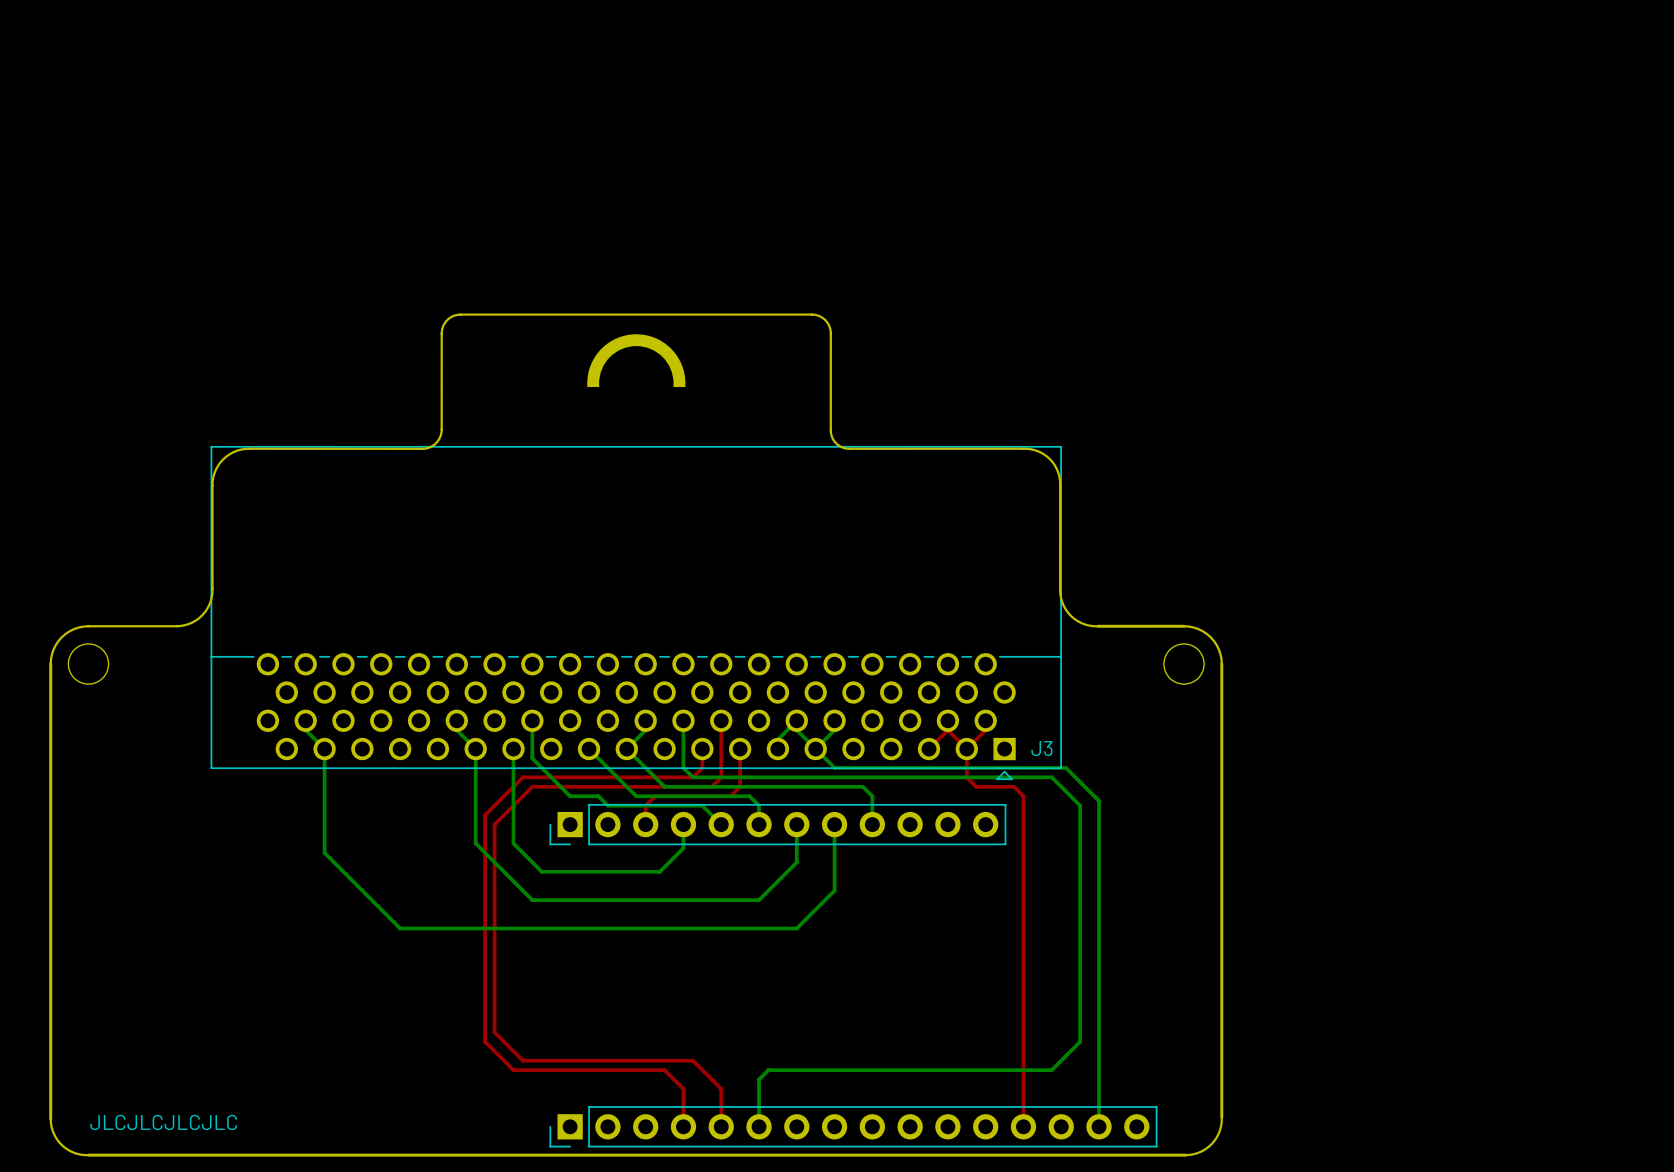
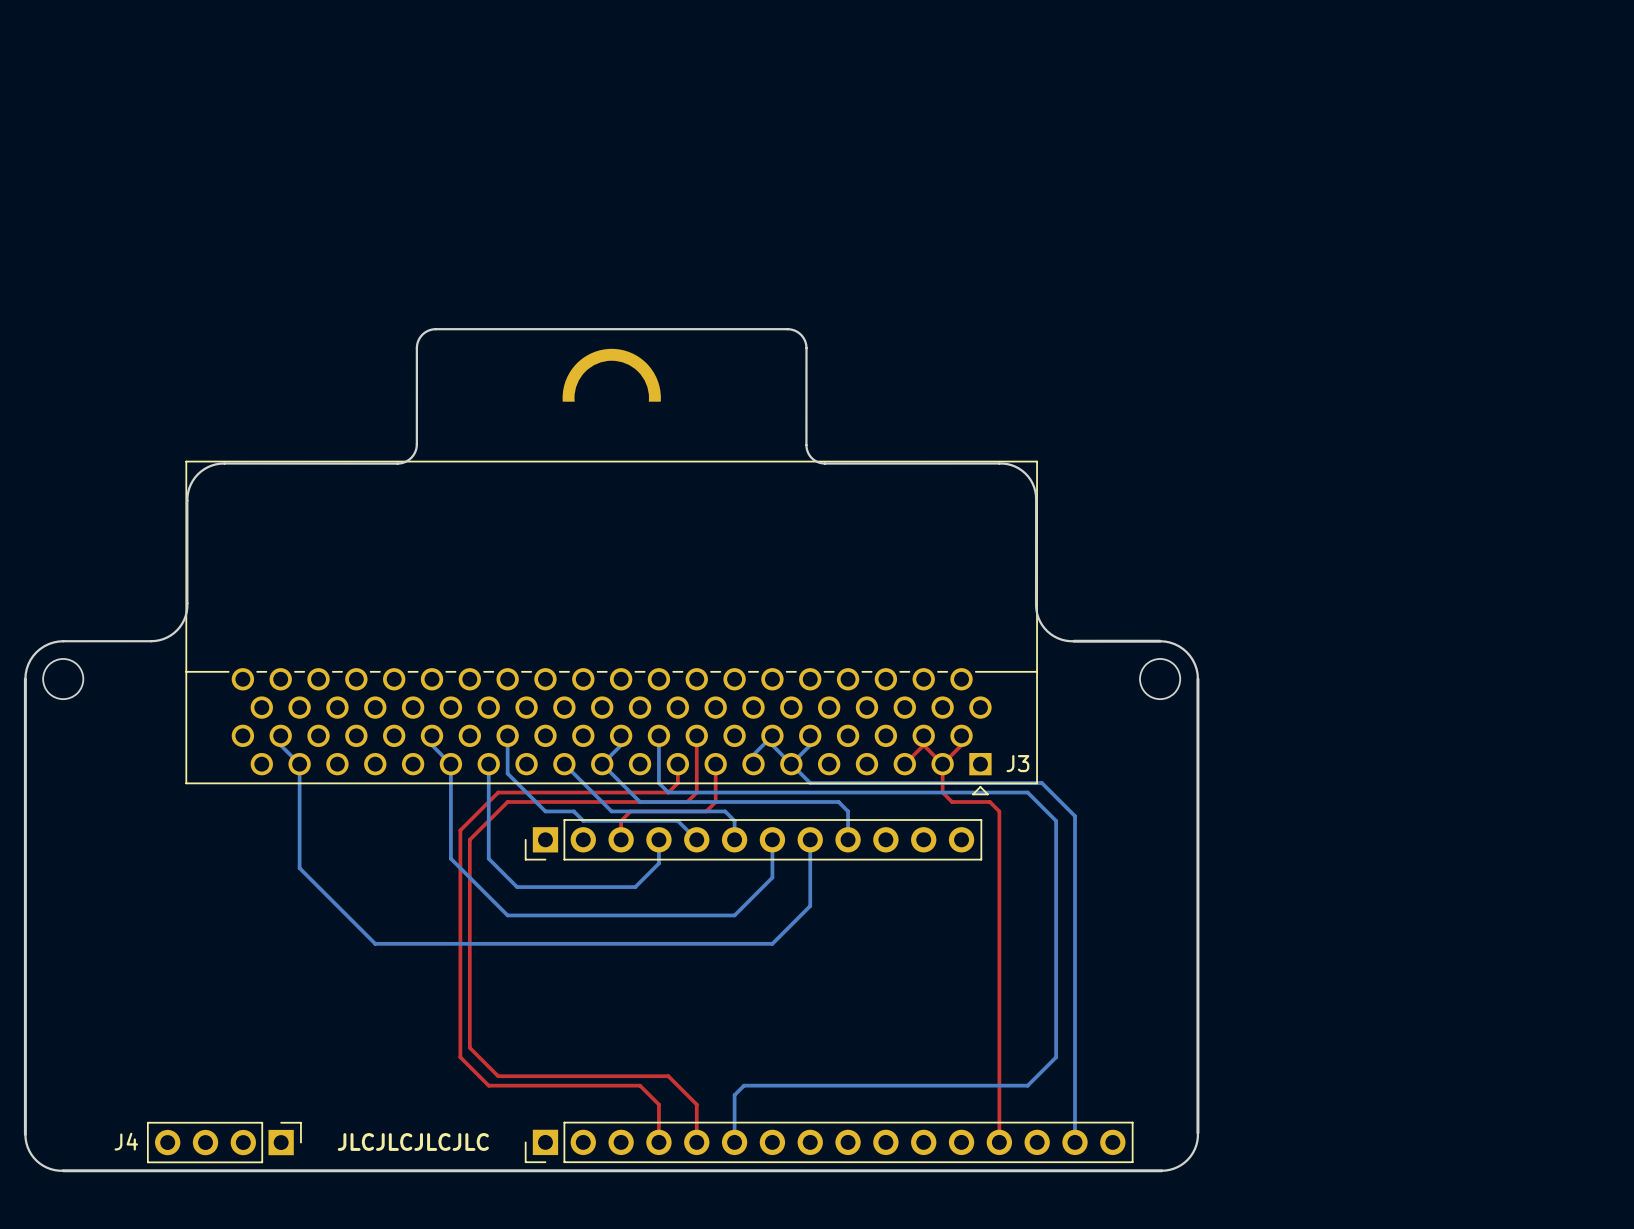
text position: JLCJLCJLCJLC (163, 1122) -> JLCJLCJLCJLC (413, 1141)
J4: none -> (224, 1142)

